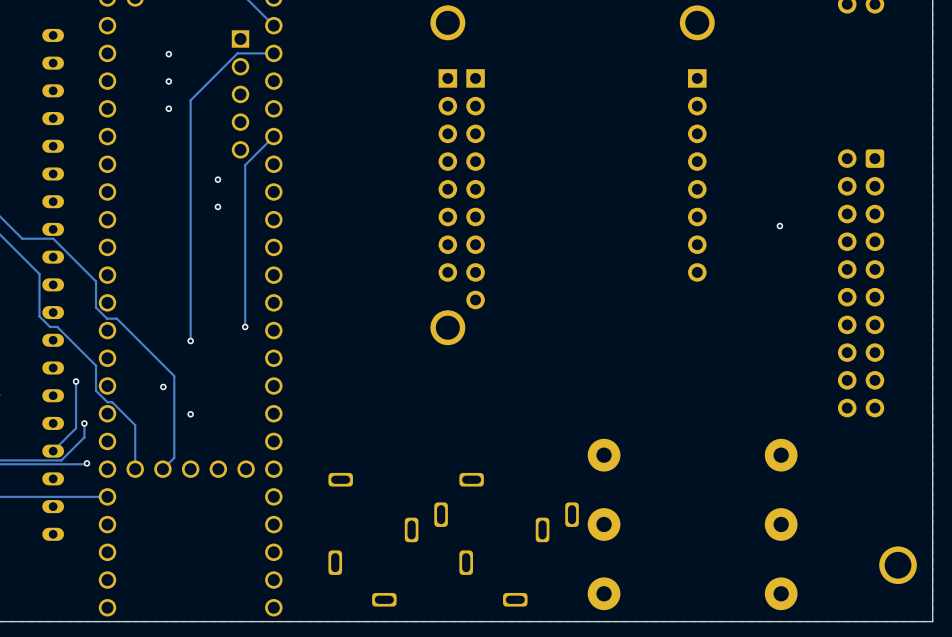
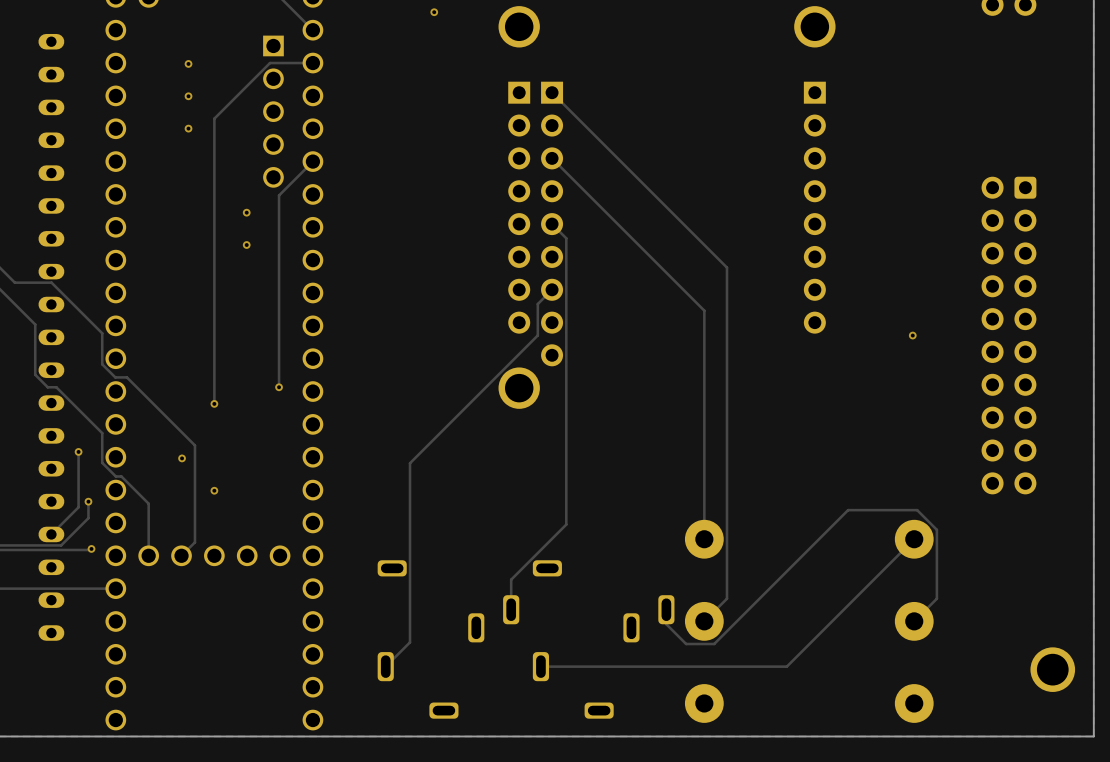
via: none -> (434, 12)
track: none -> (552, 92) (726, 267) (726, 598) (704, 621)
track: none -> (552, 158) (704, 310) (704, 539)
track: none -> (552, 224) (566, 238) (566, 524) (511, 579) (511, 609)
via position: (779, 226) -> (912, 335)
track: none -> (552, 289) (537, 304) (537, 335) (410, 463) (410, 642) (385, 666)
track: none -> (914, 539) (786, 666) (540, 666)
track: none -> (666, 609) (666, 624) (686, 644) (714, 644) (848, 510) (917, 510) (936, 529) (936, 598) (914, 621)

